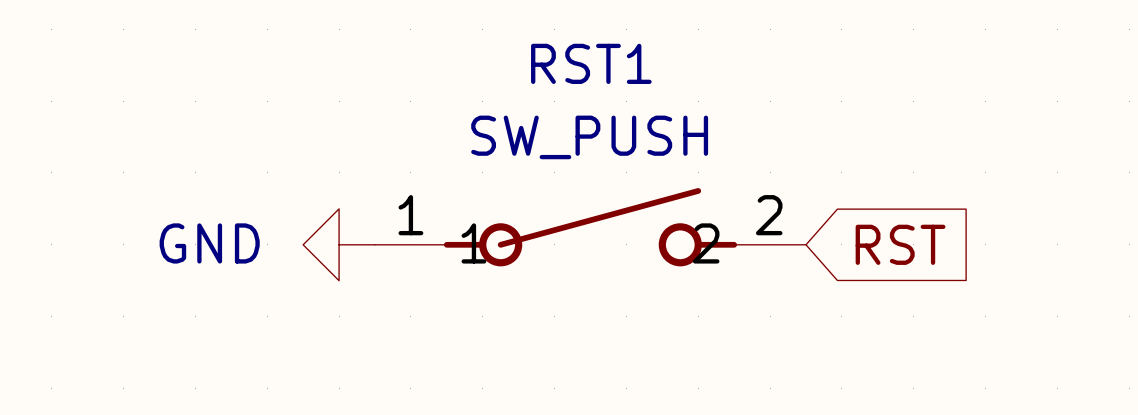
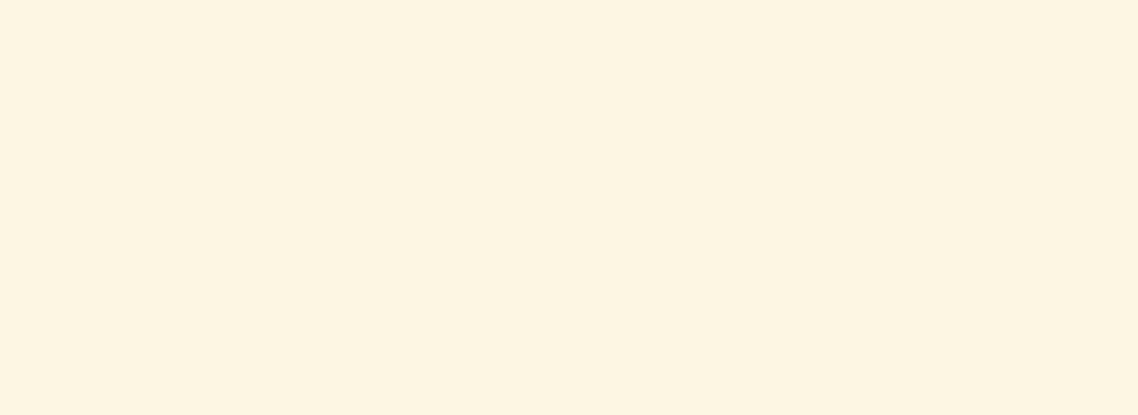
RST1: SW_PUSH (590, 227) -> none
power symbol: GND (339, 244) -> none
global label: RST (900, 244) -> none

